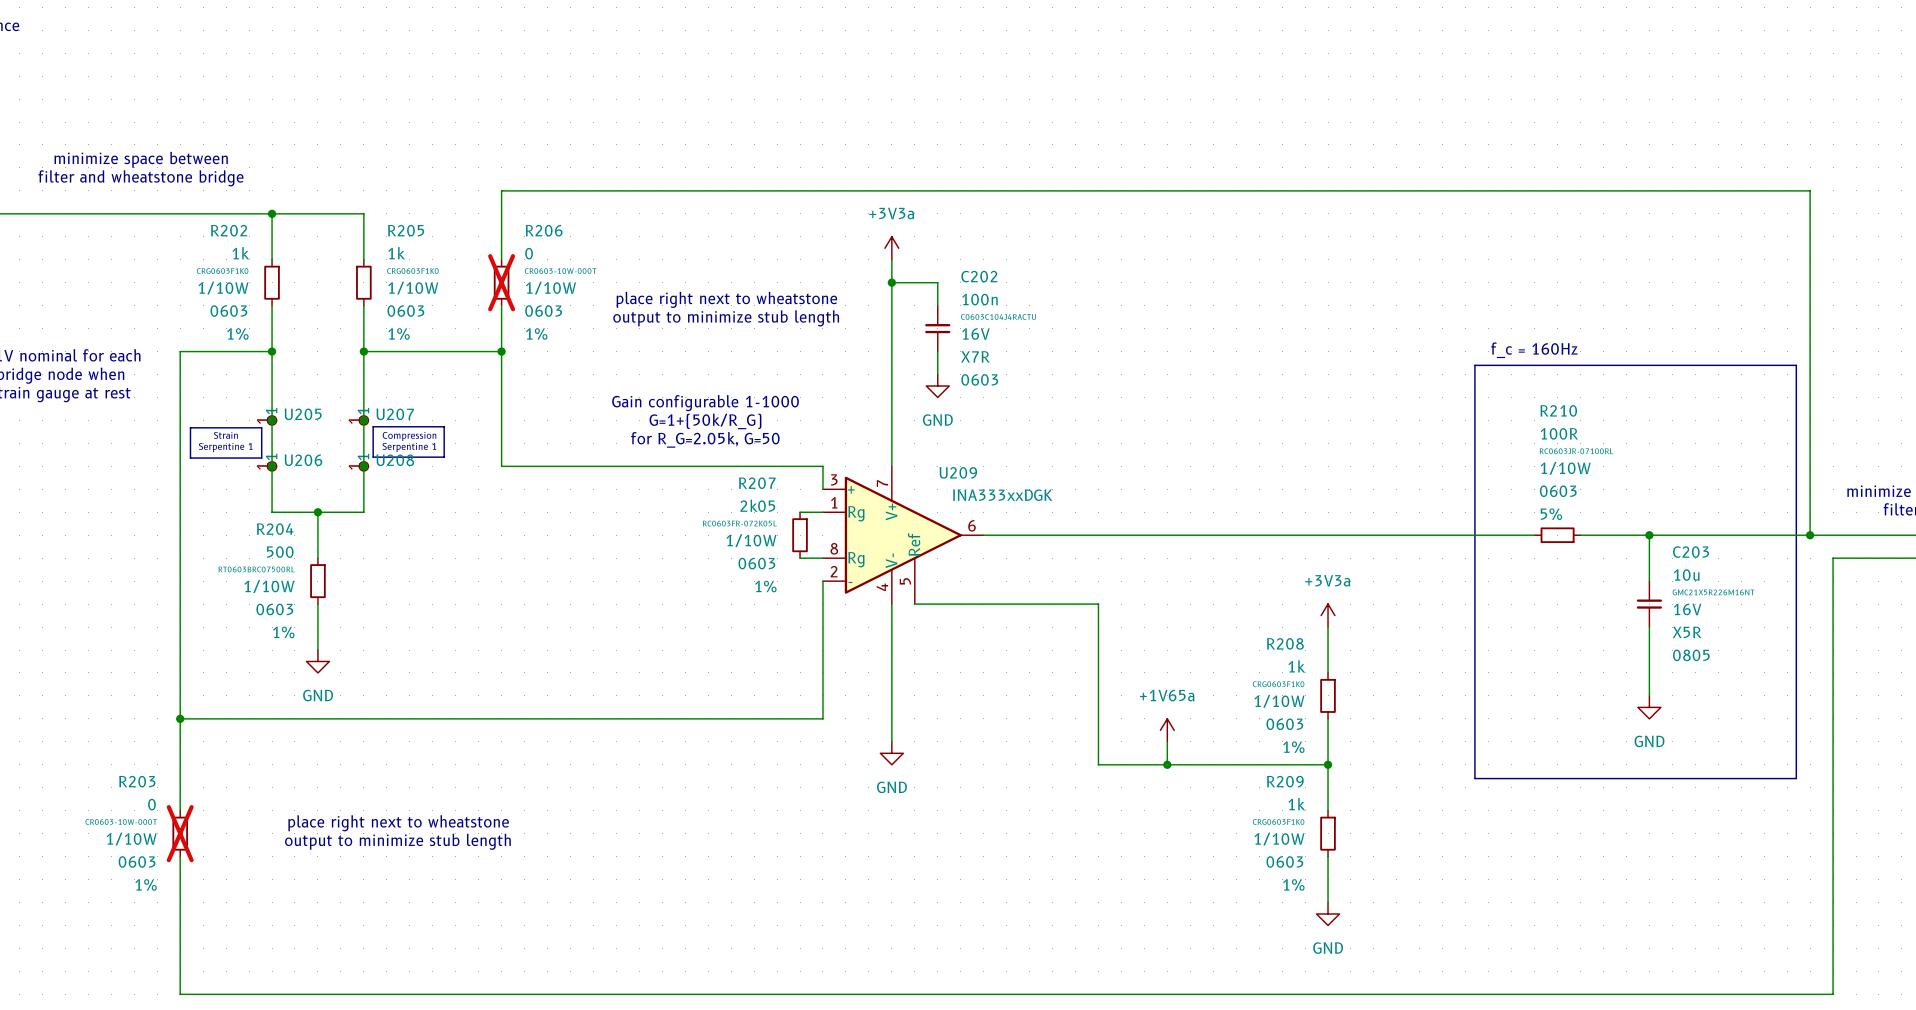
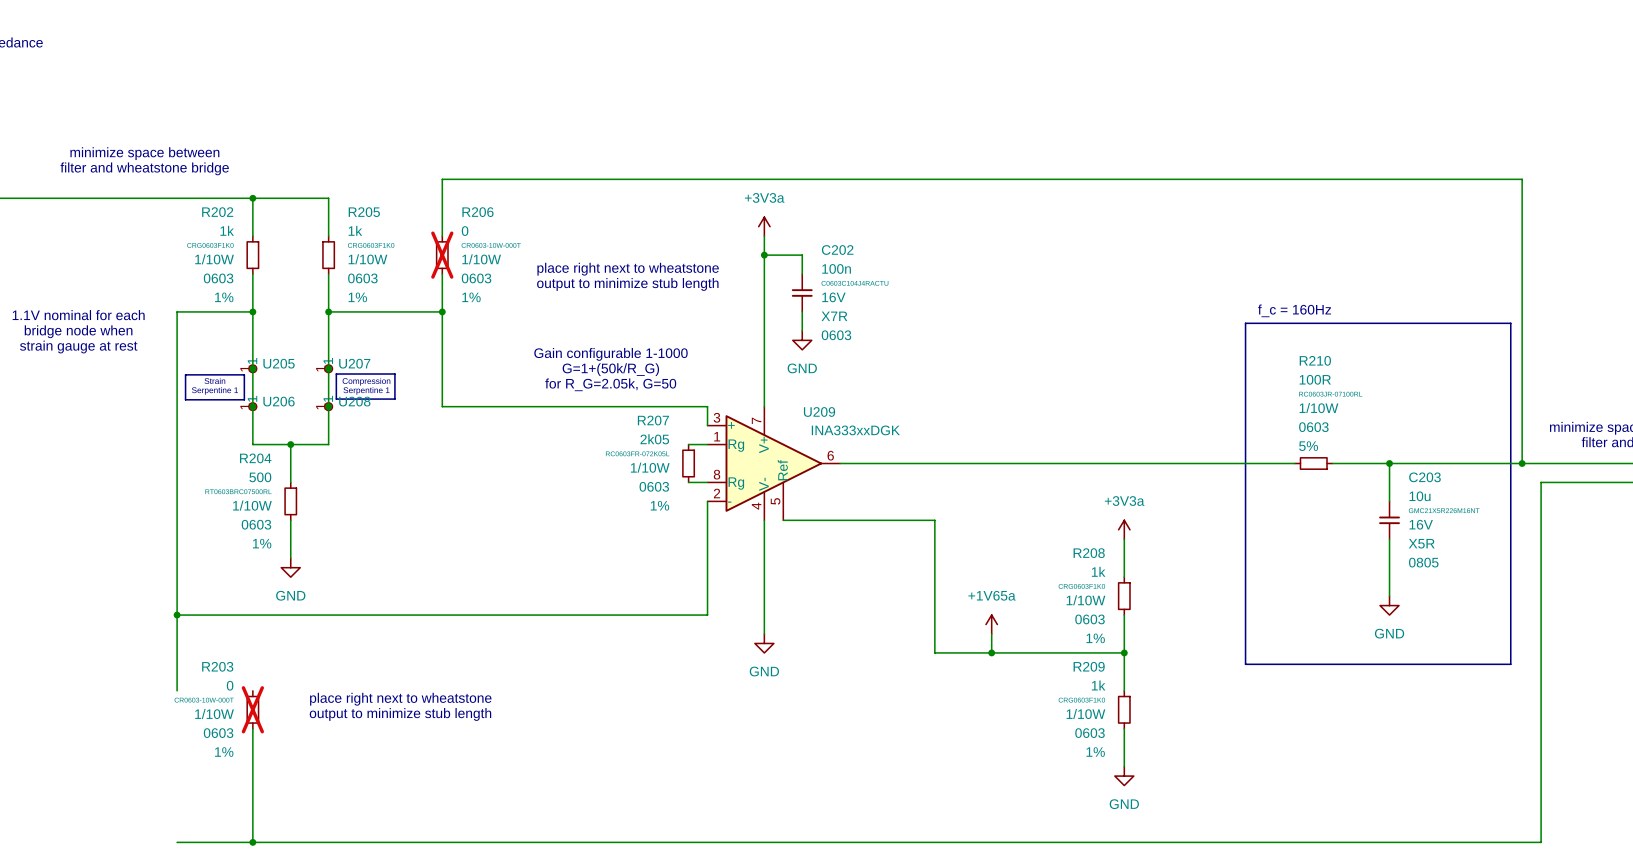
text position: place right next to wheatstone (398, 823) -> place right next to wheatstone (400, 699)
R203 position: (180, 833) -> (252, 709)
text position: output to minimize stub length (397, 841) -> output to minimize stub length (400, 714)
wire: (180, 856) (180, 994) -> (252, 728) (252, 842)
junction: none -> (252, 842)

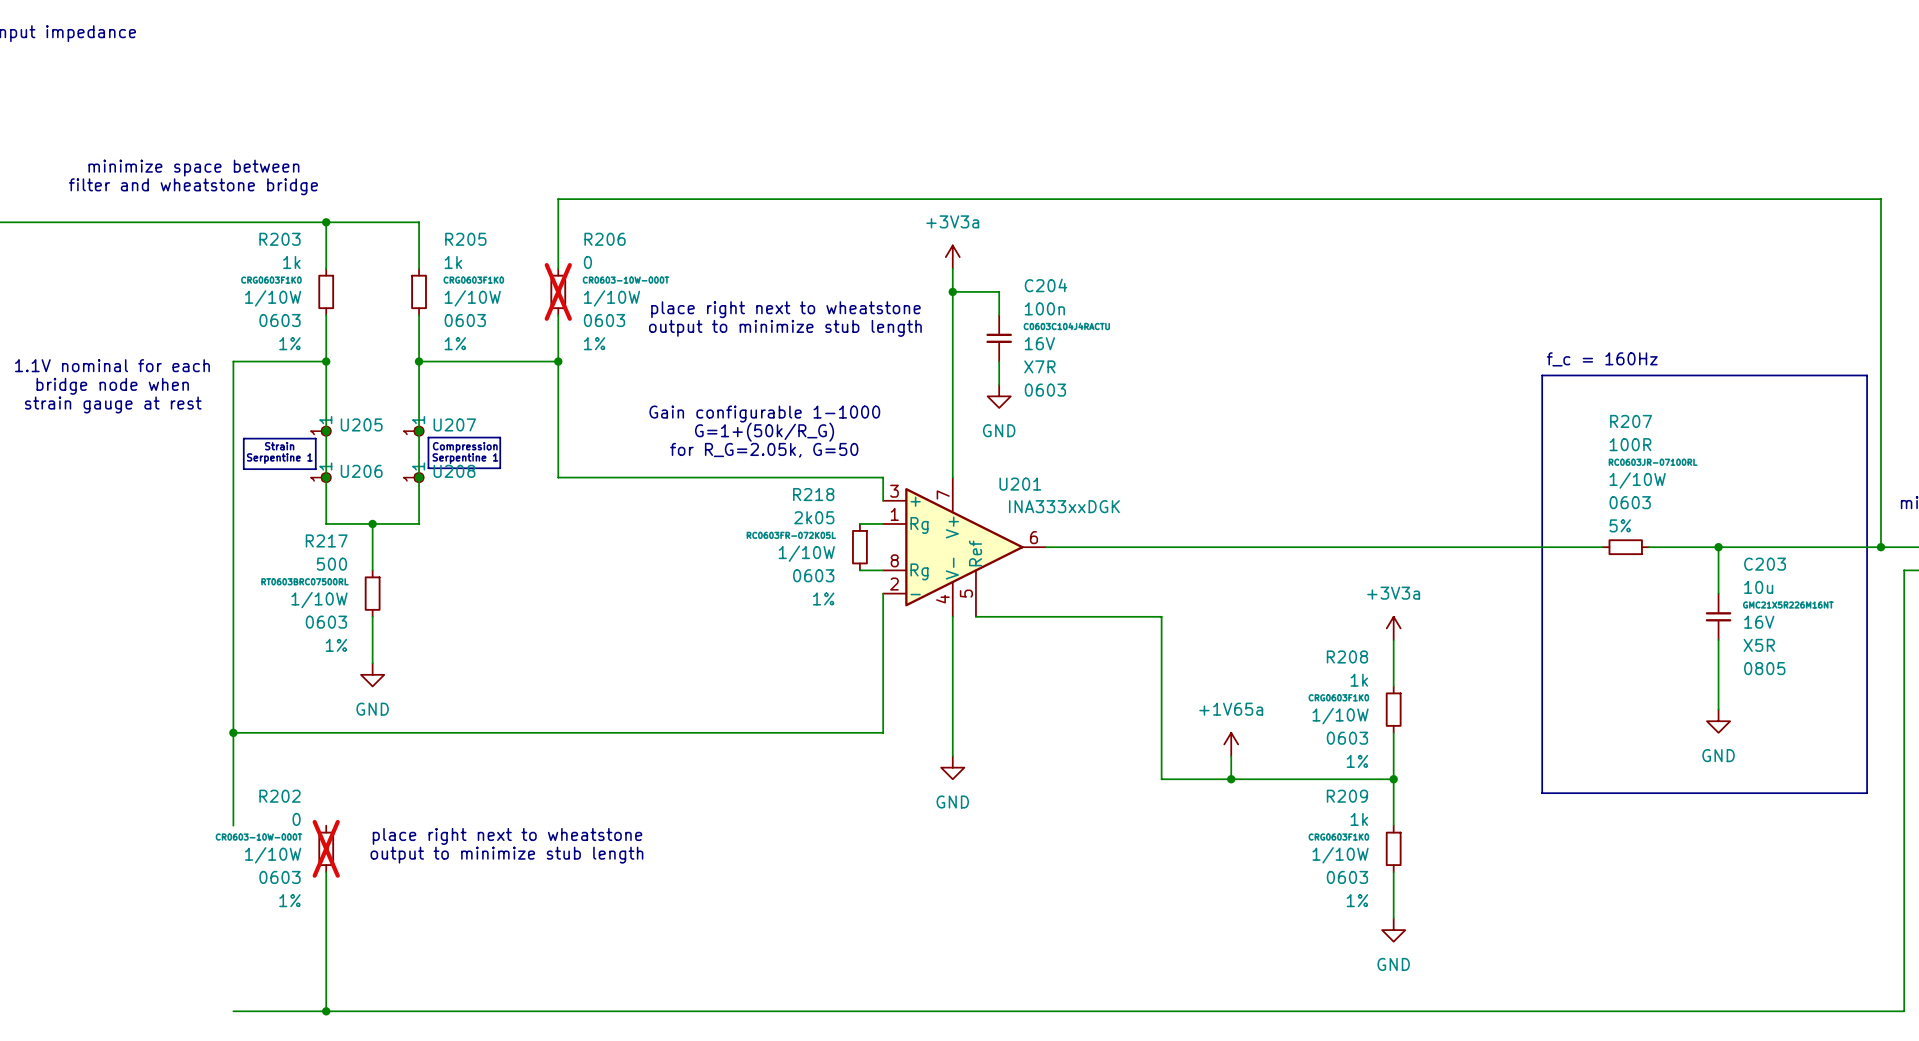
R202 name: R202 (217, 212) -> R203 (279, 239)
C202 name: C202 (837, 250) -> C204 (1045, 285)
R210 name: R210 (1315, 360) -> R207 (1631, 421)
U209 name: U209 (819, 411) -> U201 (1020, 484)
R207 name: R207 (653, 420) -> R218 (813, 494)
R204 name: R204 (255, 458) -> R217 (326, 540)
R203 name: R203 (217, 666) -> R202 (279, 796)

